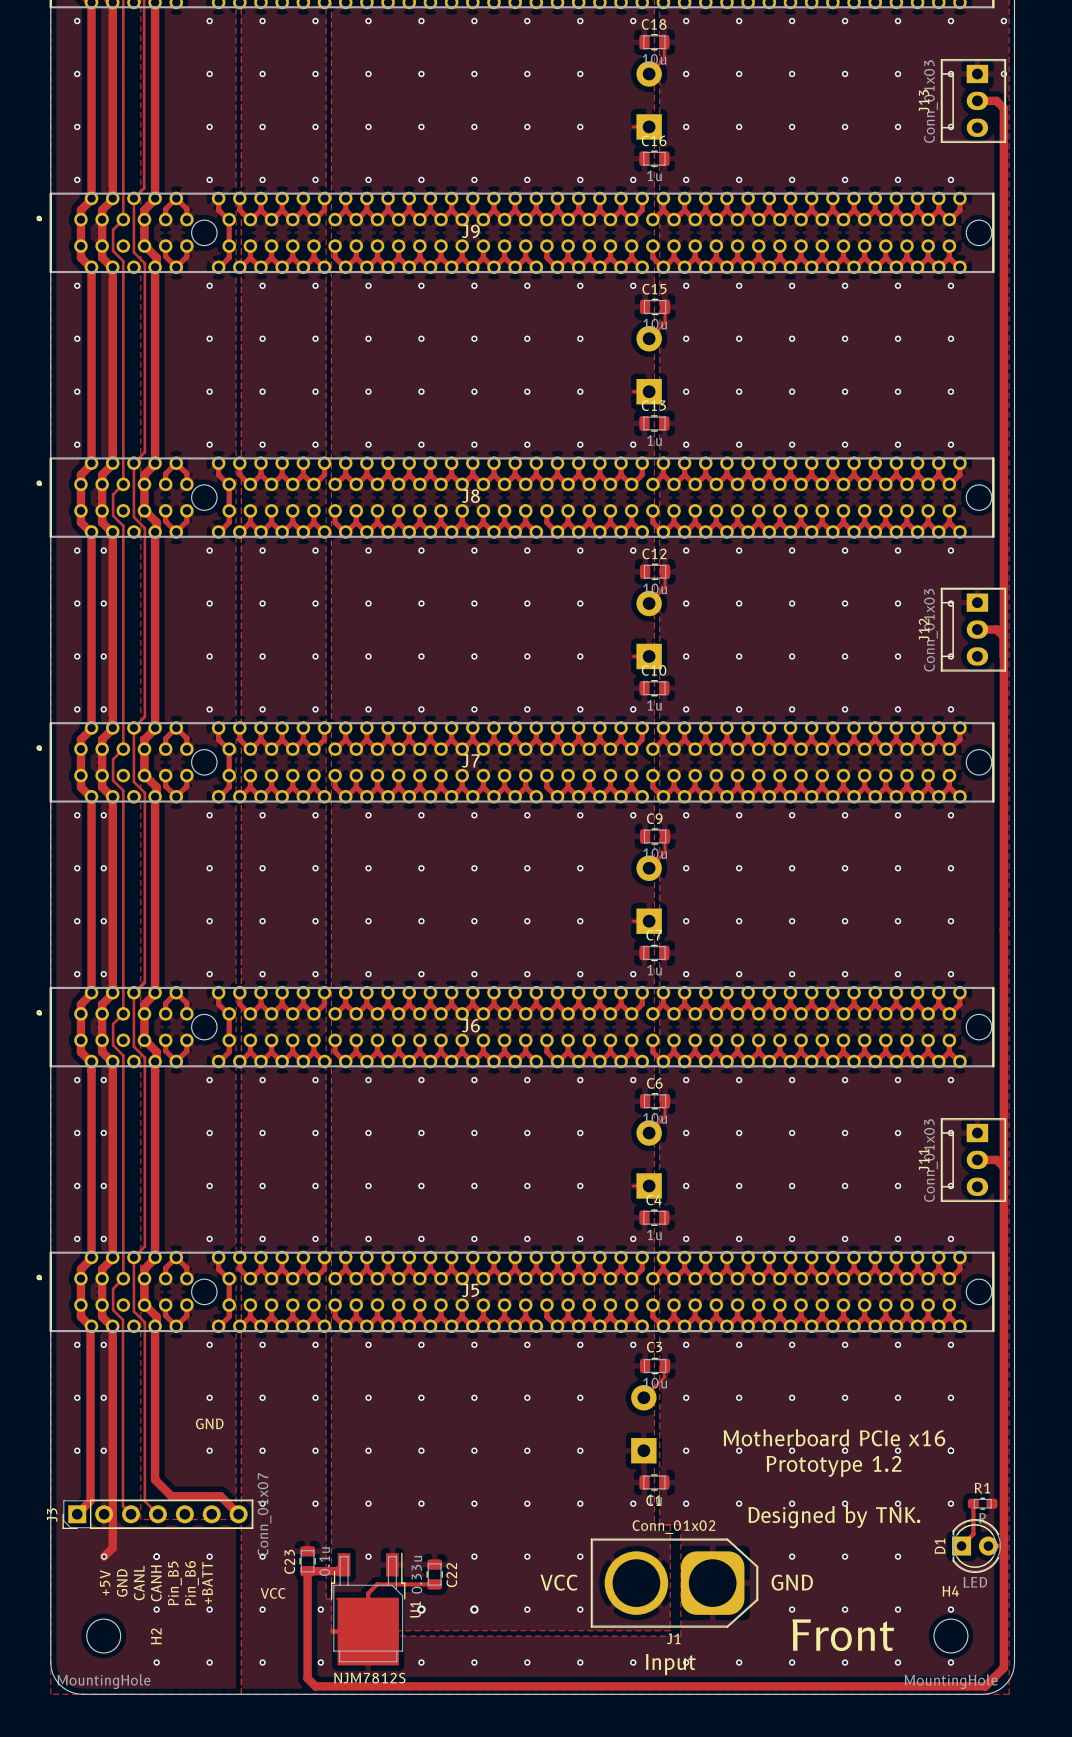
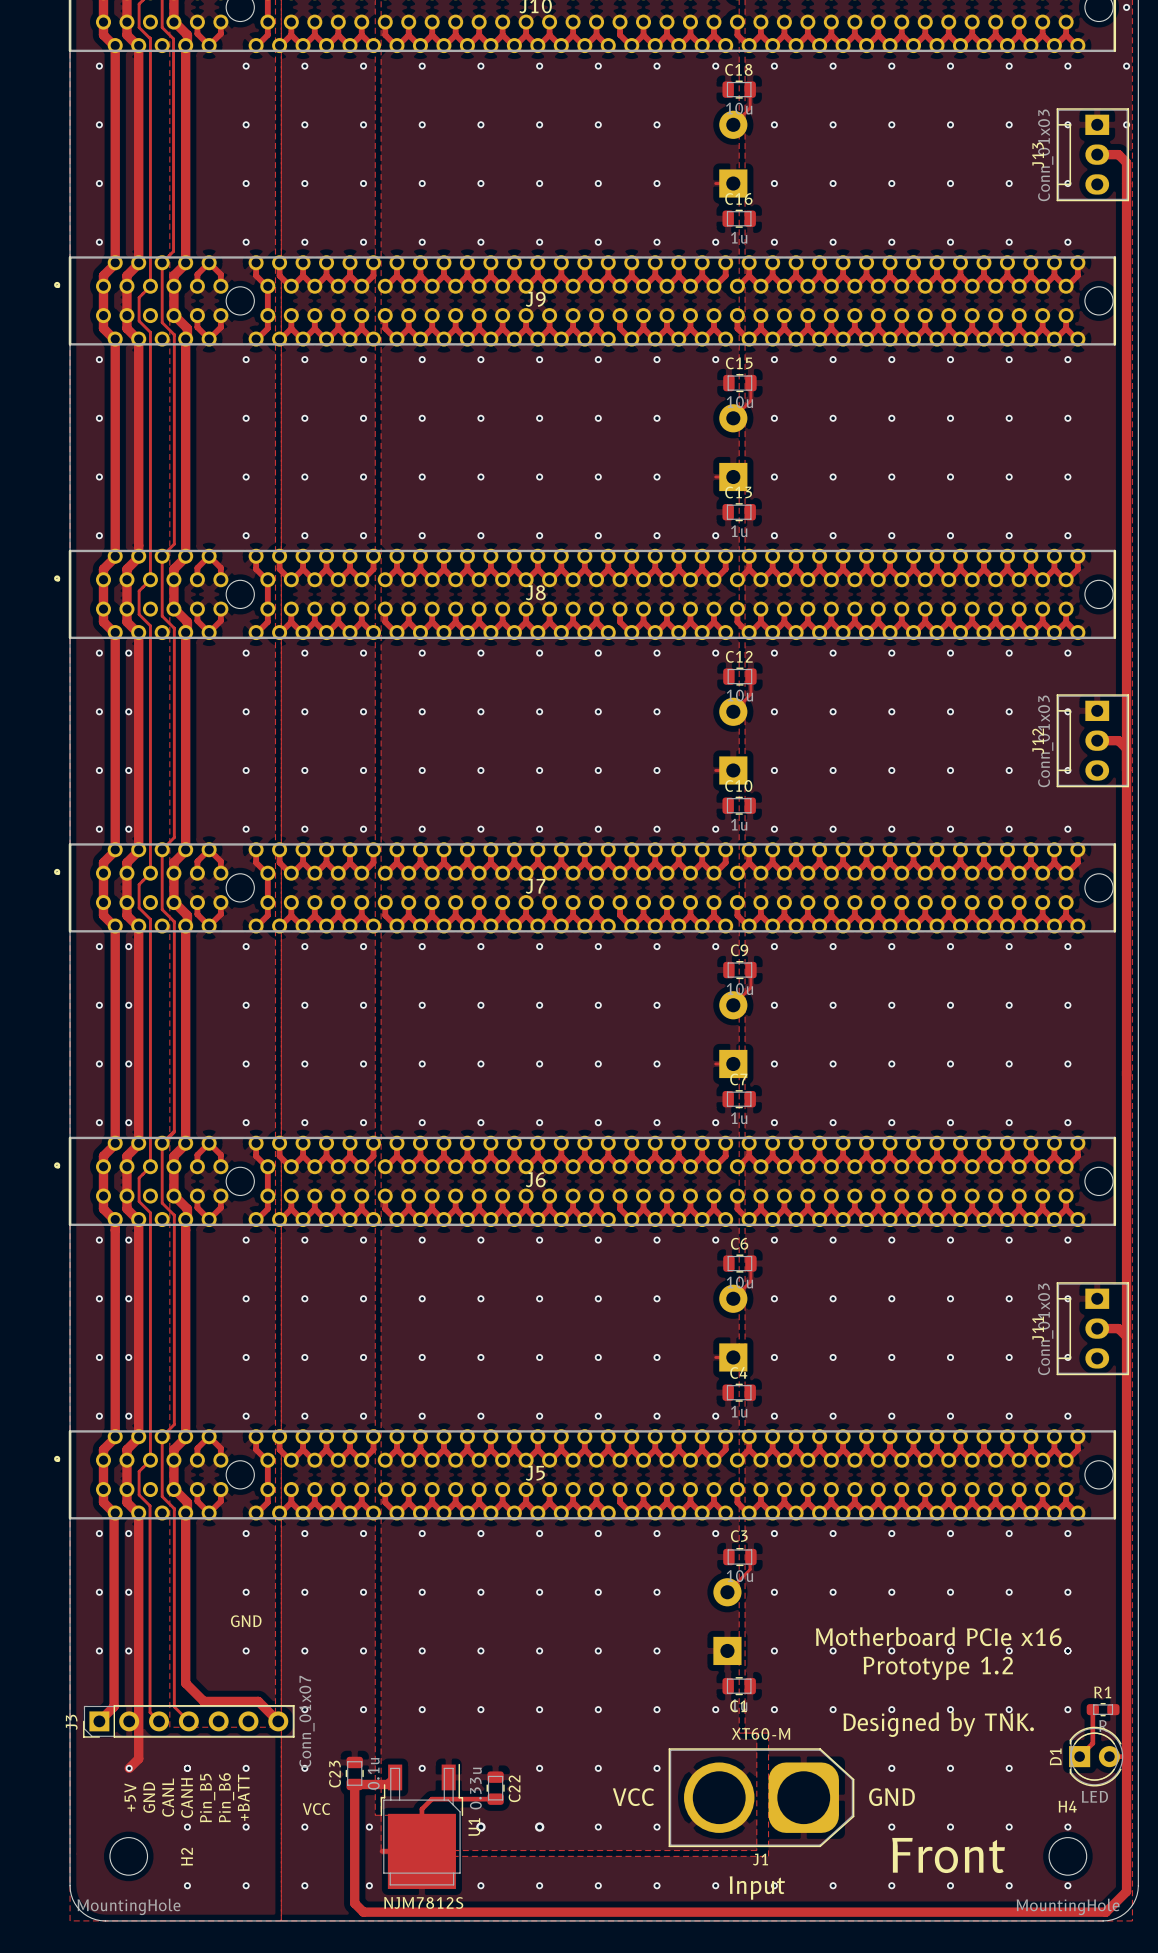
J1 value: Conn_01x02 (674, 1527) -> XT60-M (760, 1733)

